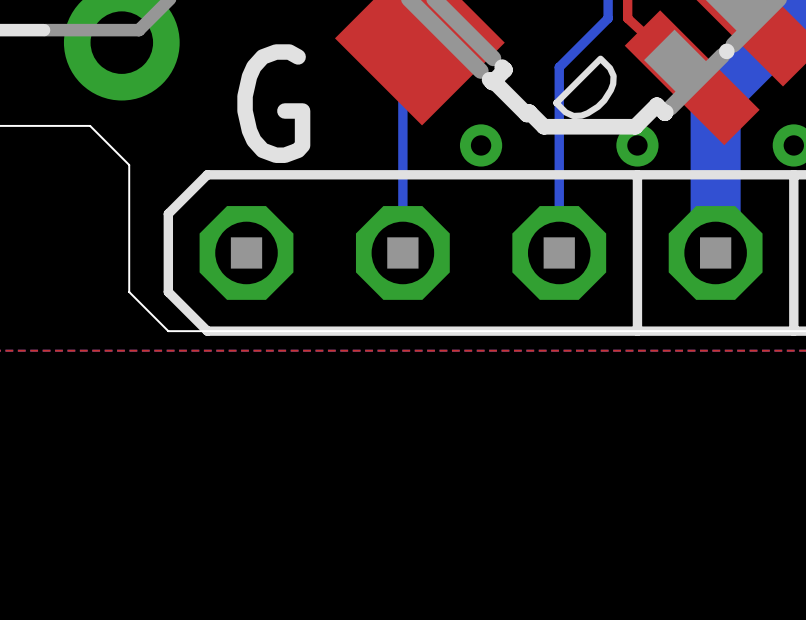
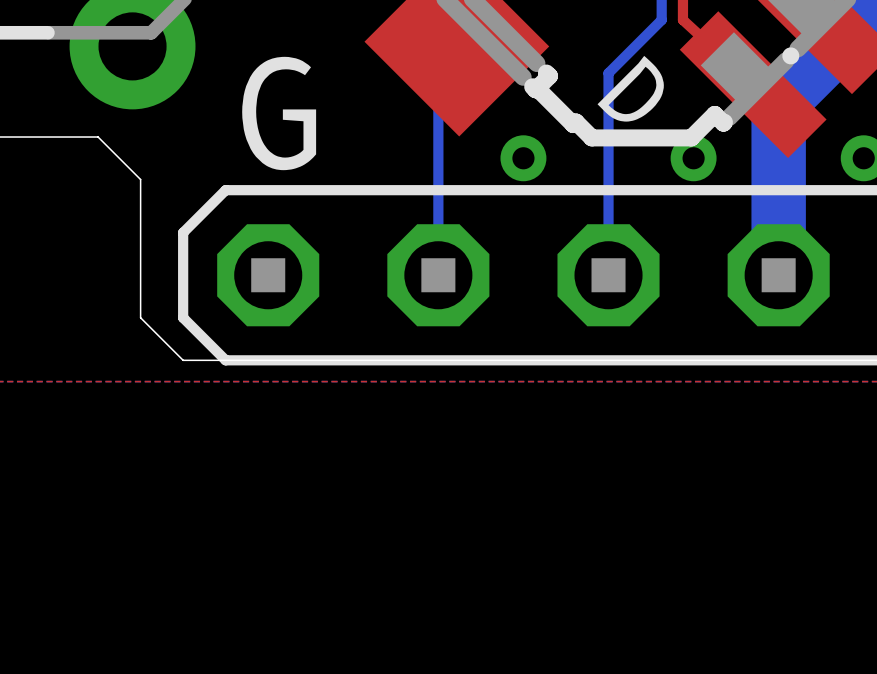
line: (637, 174) (637, 331) -> none
line: (793, 174) (793, 331) -> none

